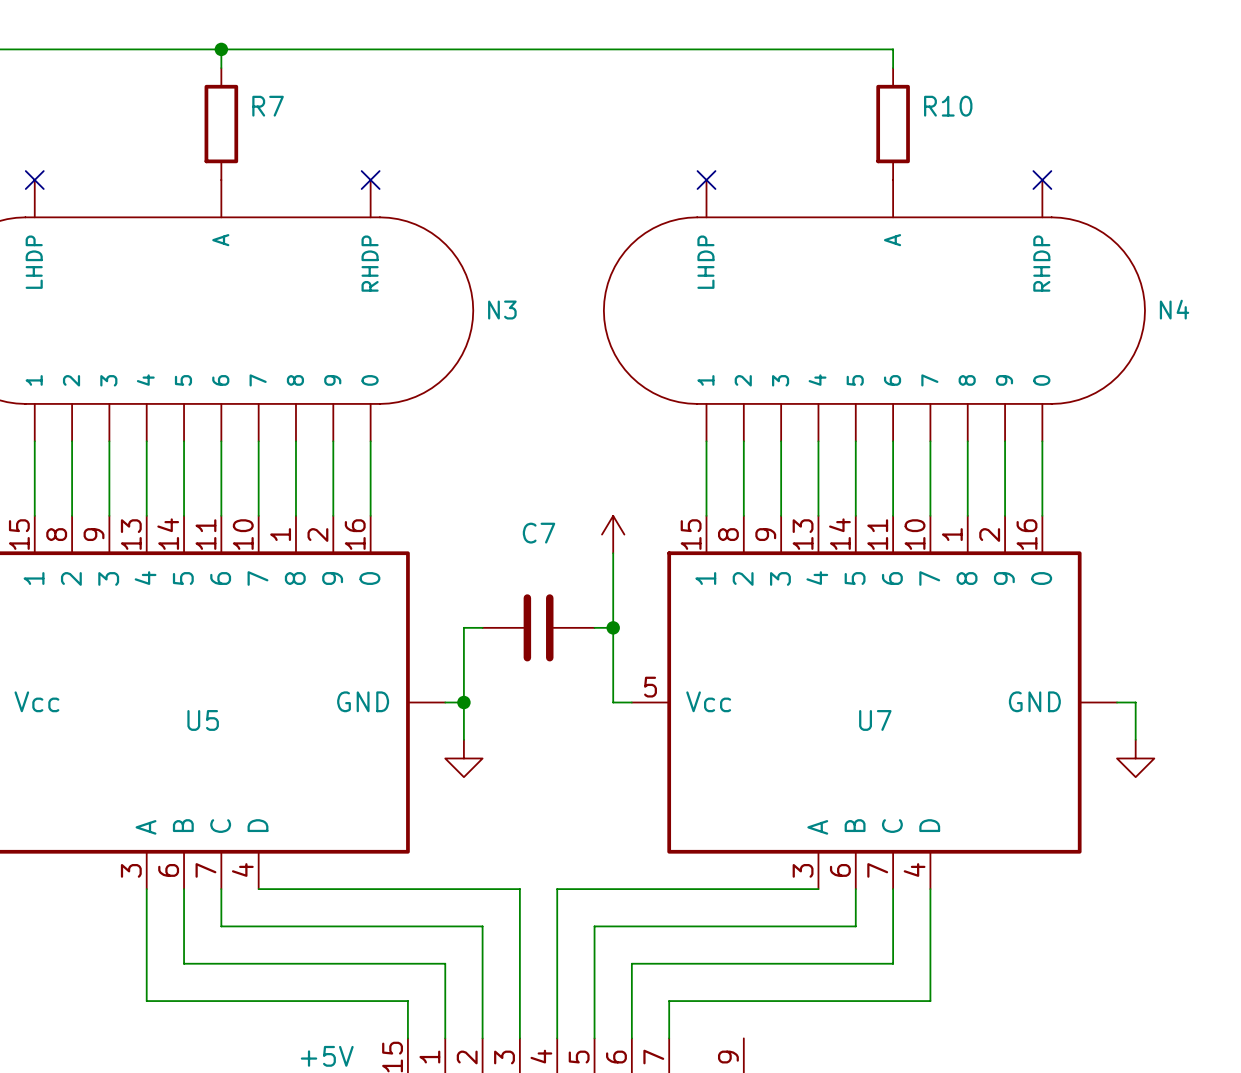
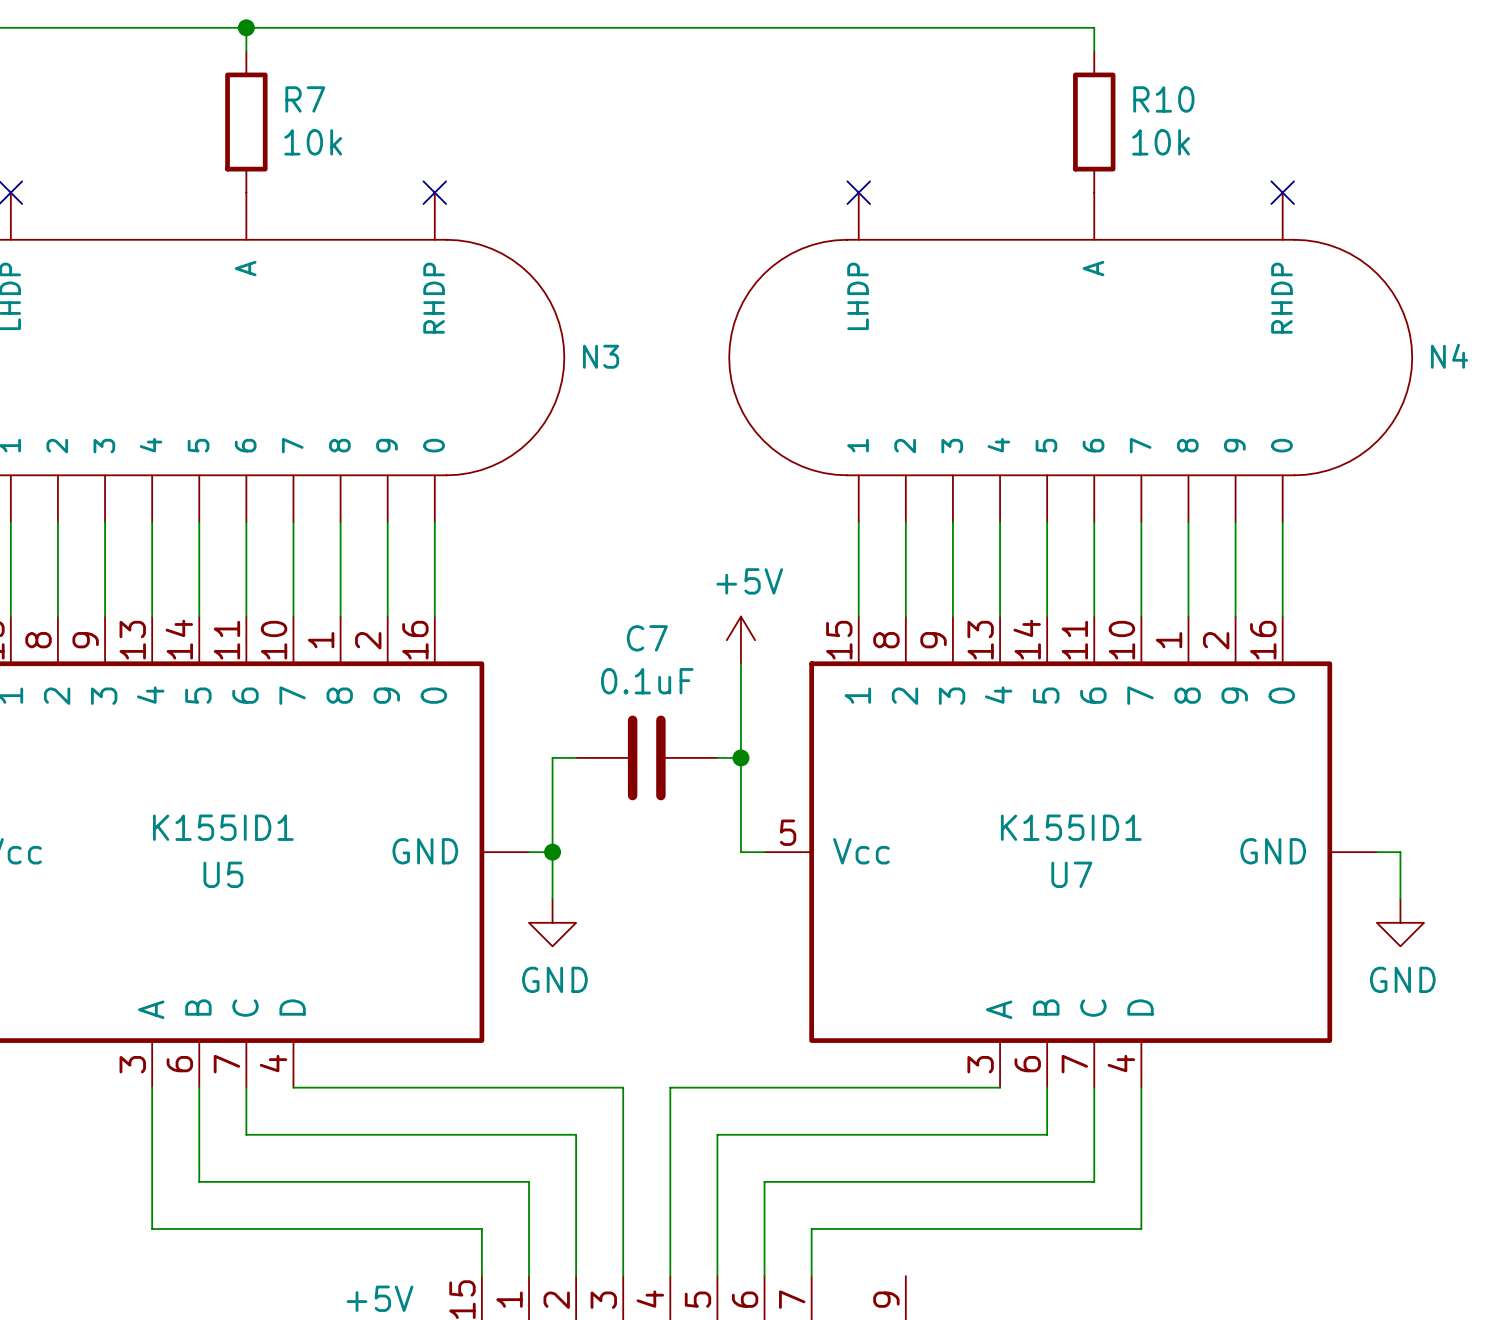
R7 value: none -> 10k (313, 142)
R10 value: none -> 10k (1161, 142)
power symbol text: none -> +5V (749, 581)
C7 value: none -> 0.1uF (647, 681)
U5 value: none -> K155ID1 (223, 827)
U7 value: none -> K155ID1 (1071, 827)
power symbol text: none -> GND (554, 979)
power symbol text: none -> GND (1402, 979)

